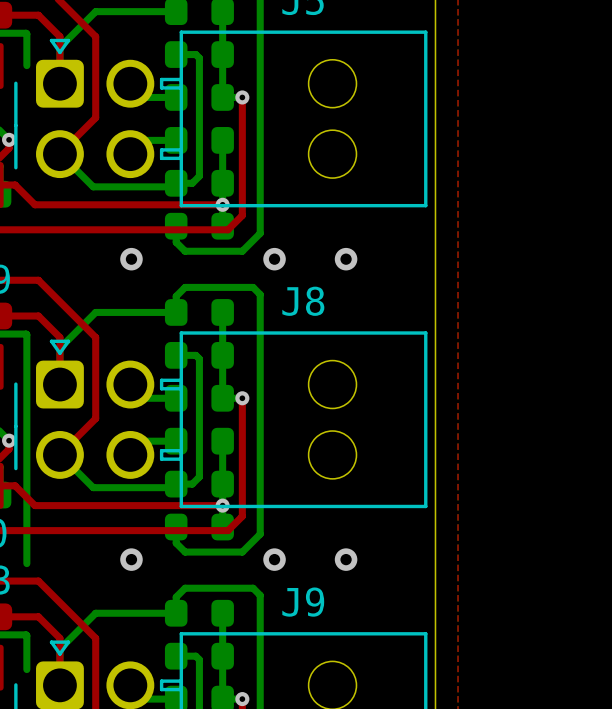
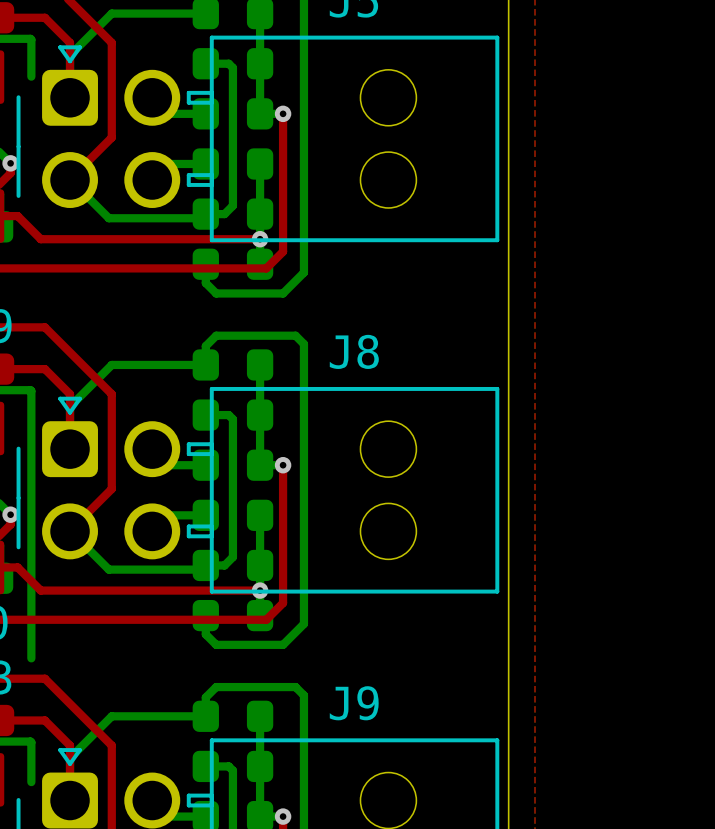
via: (131, 259) -> none
via: (274, 259) -> none
via: (346, 259) -> none
via: (131, 559) -> none
via: (274, 559) -> none
via: (346, 559) -> none

